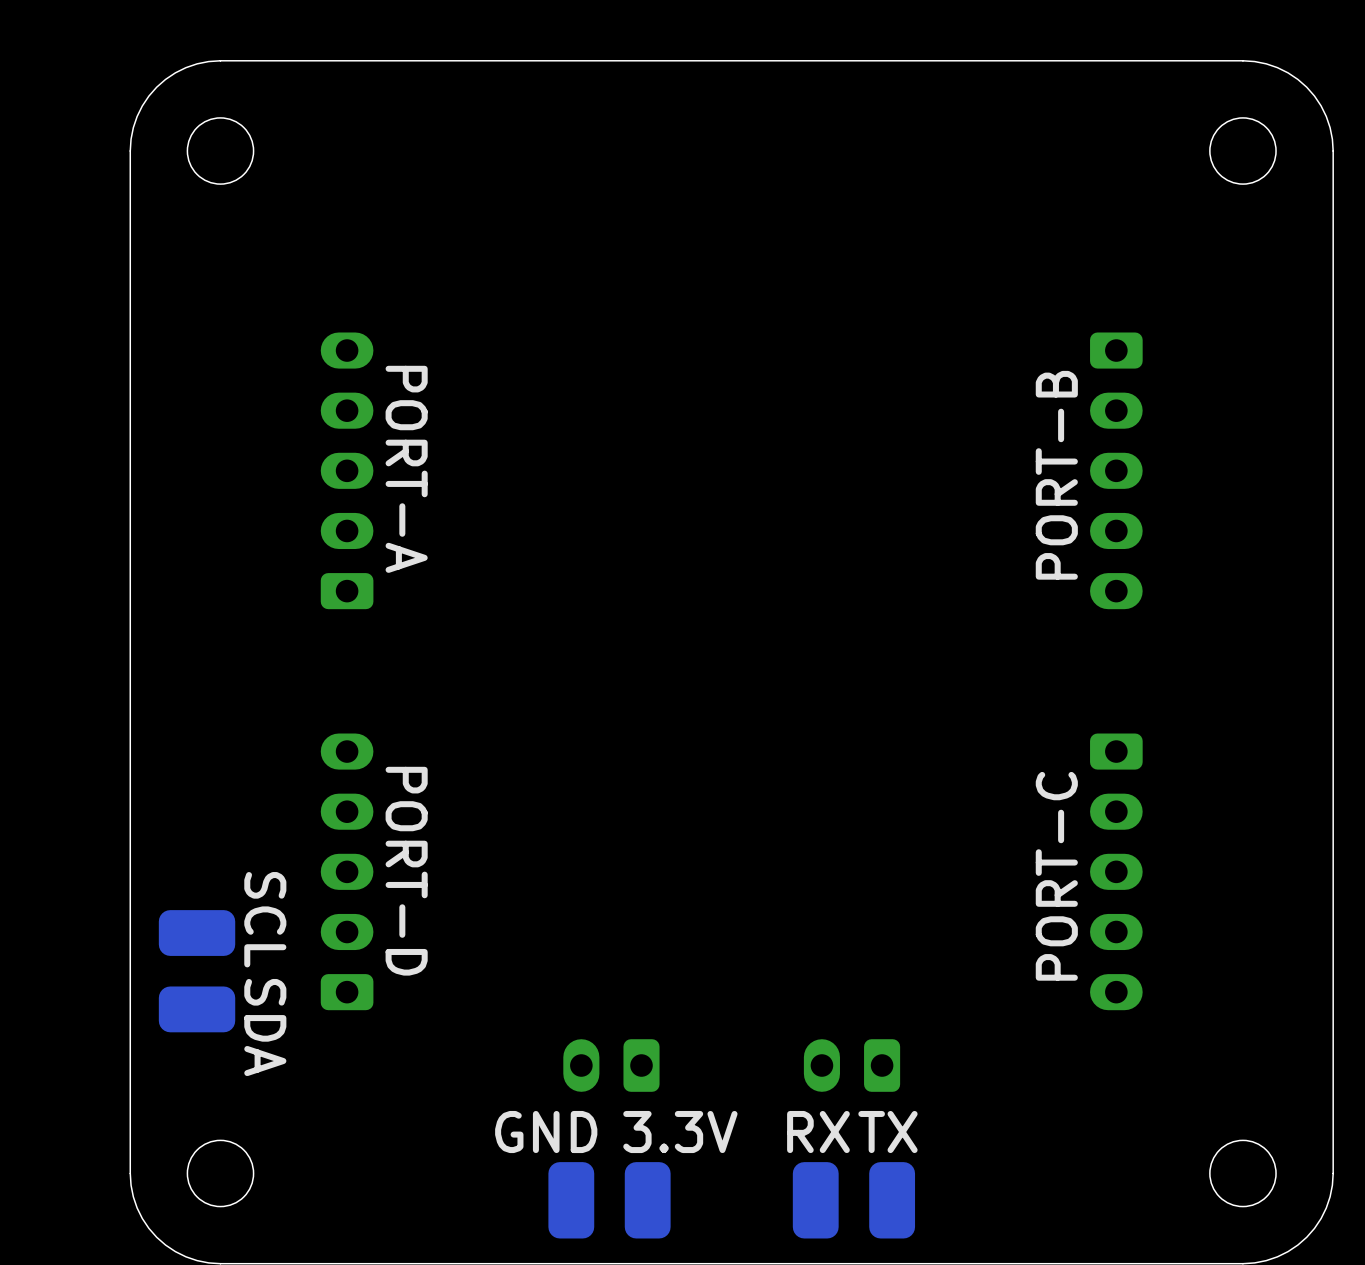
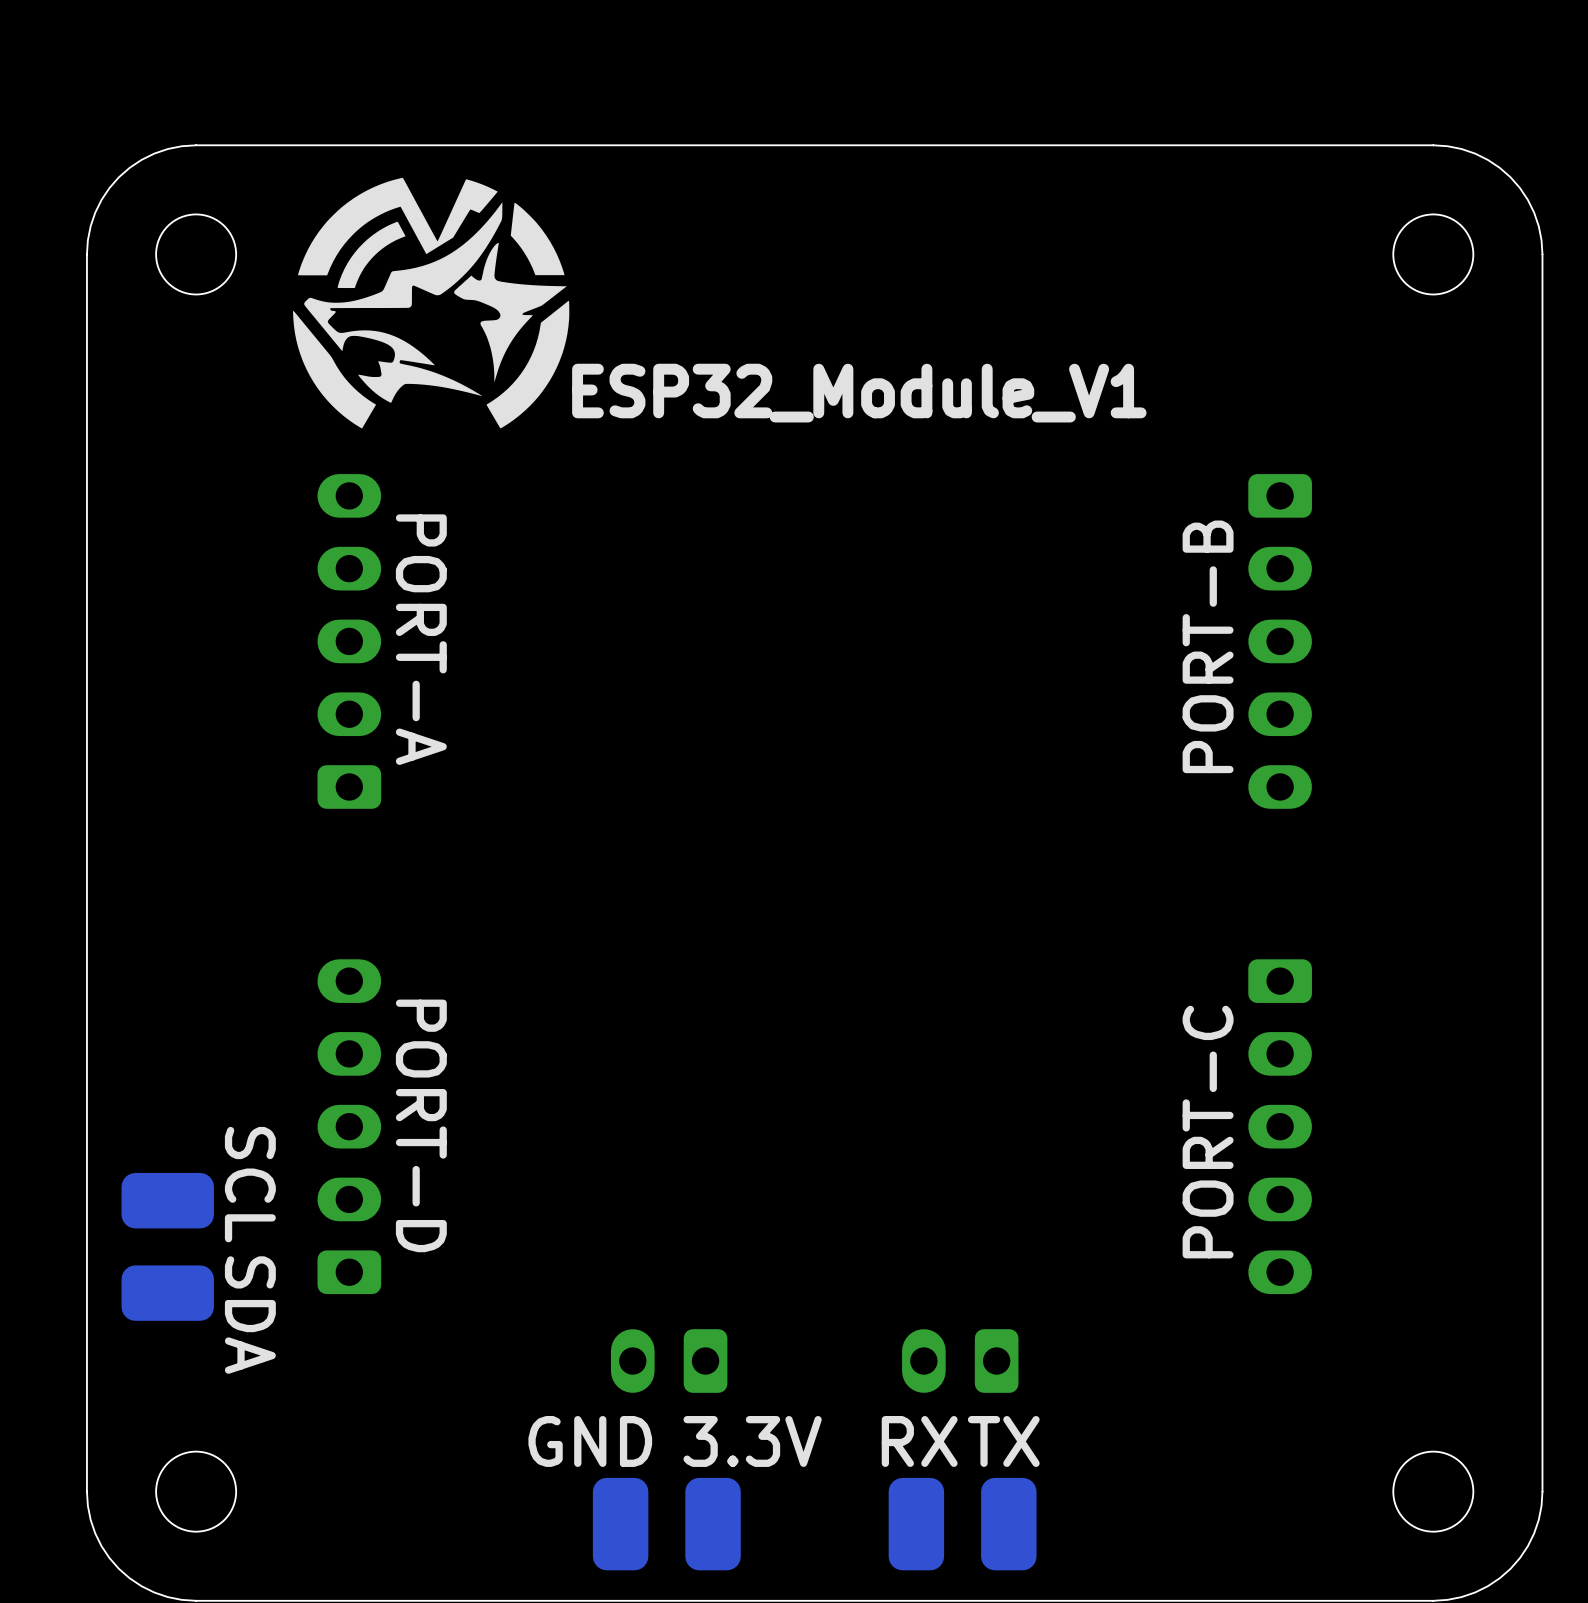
drawing: none -> [293, 177, 570, 429]
text: none -> ESP32_Module_V1 (859, 393)

